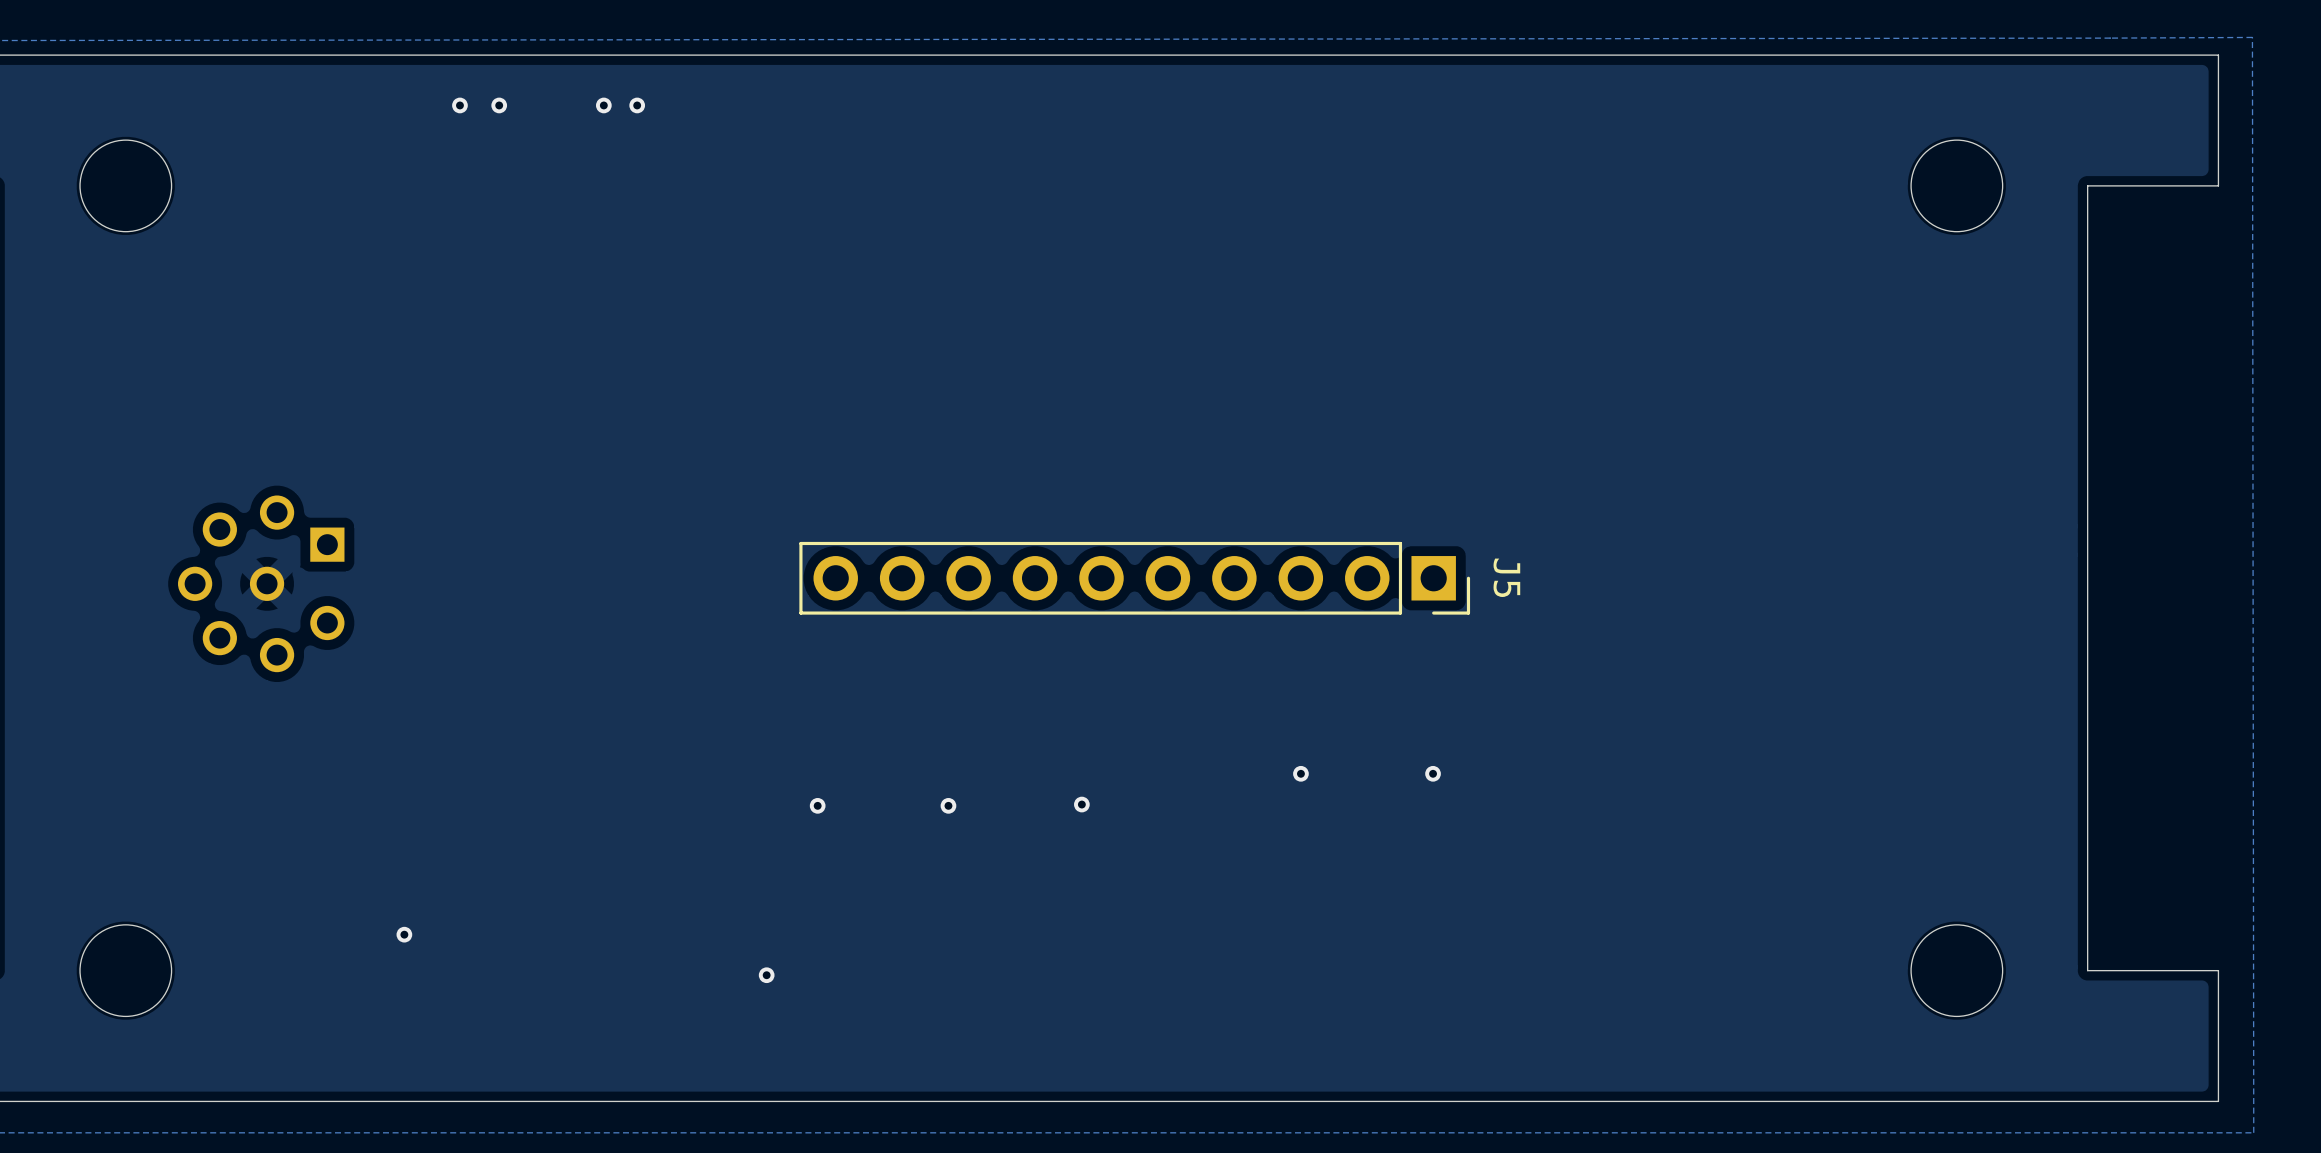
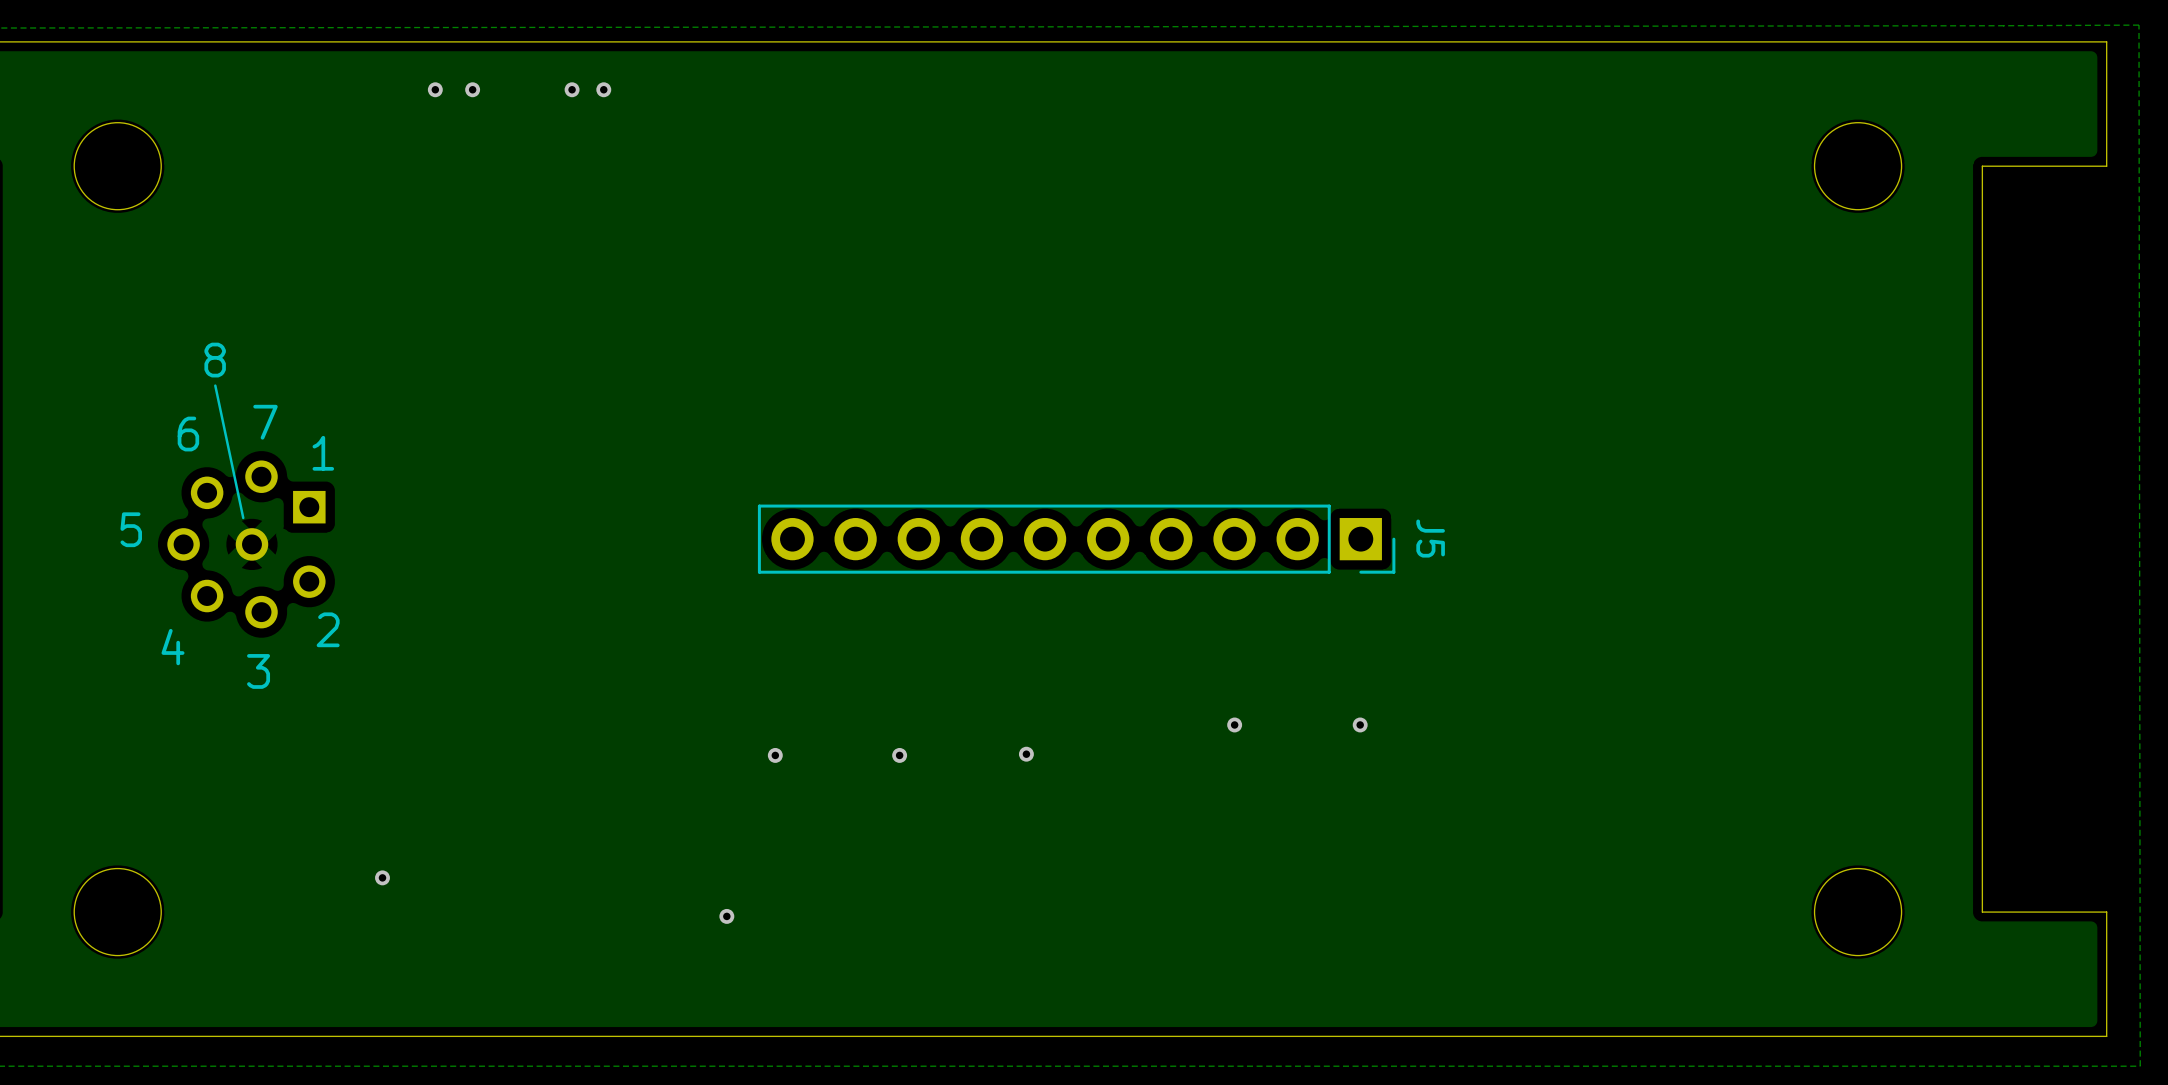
text: none -> 8 (215, 360)
line: none -> (215, 385) (243, 518)
text: none -> 7 (265, 422)
text: none -> 6 (188, 434)
text: none -> 1 (323, 453)
text: none -> 5 (131, 529)
text: none -> 2 (328, 629)
text: none -> 4 (173, 647)
text: none -> 3 (258, 671)

